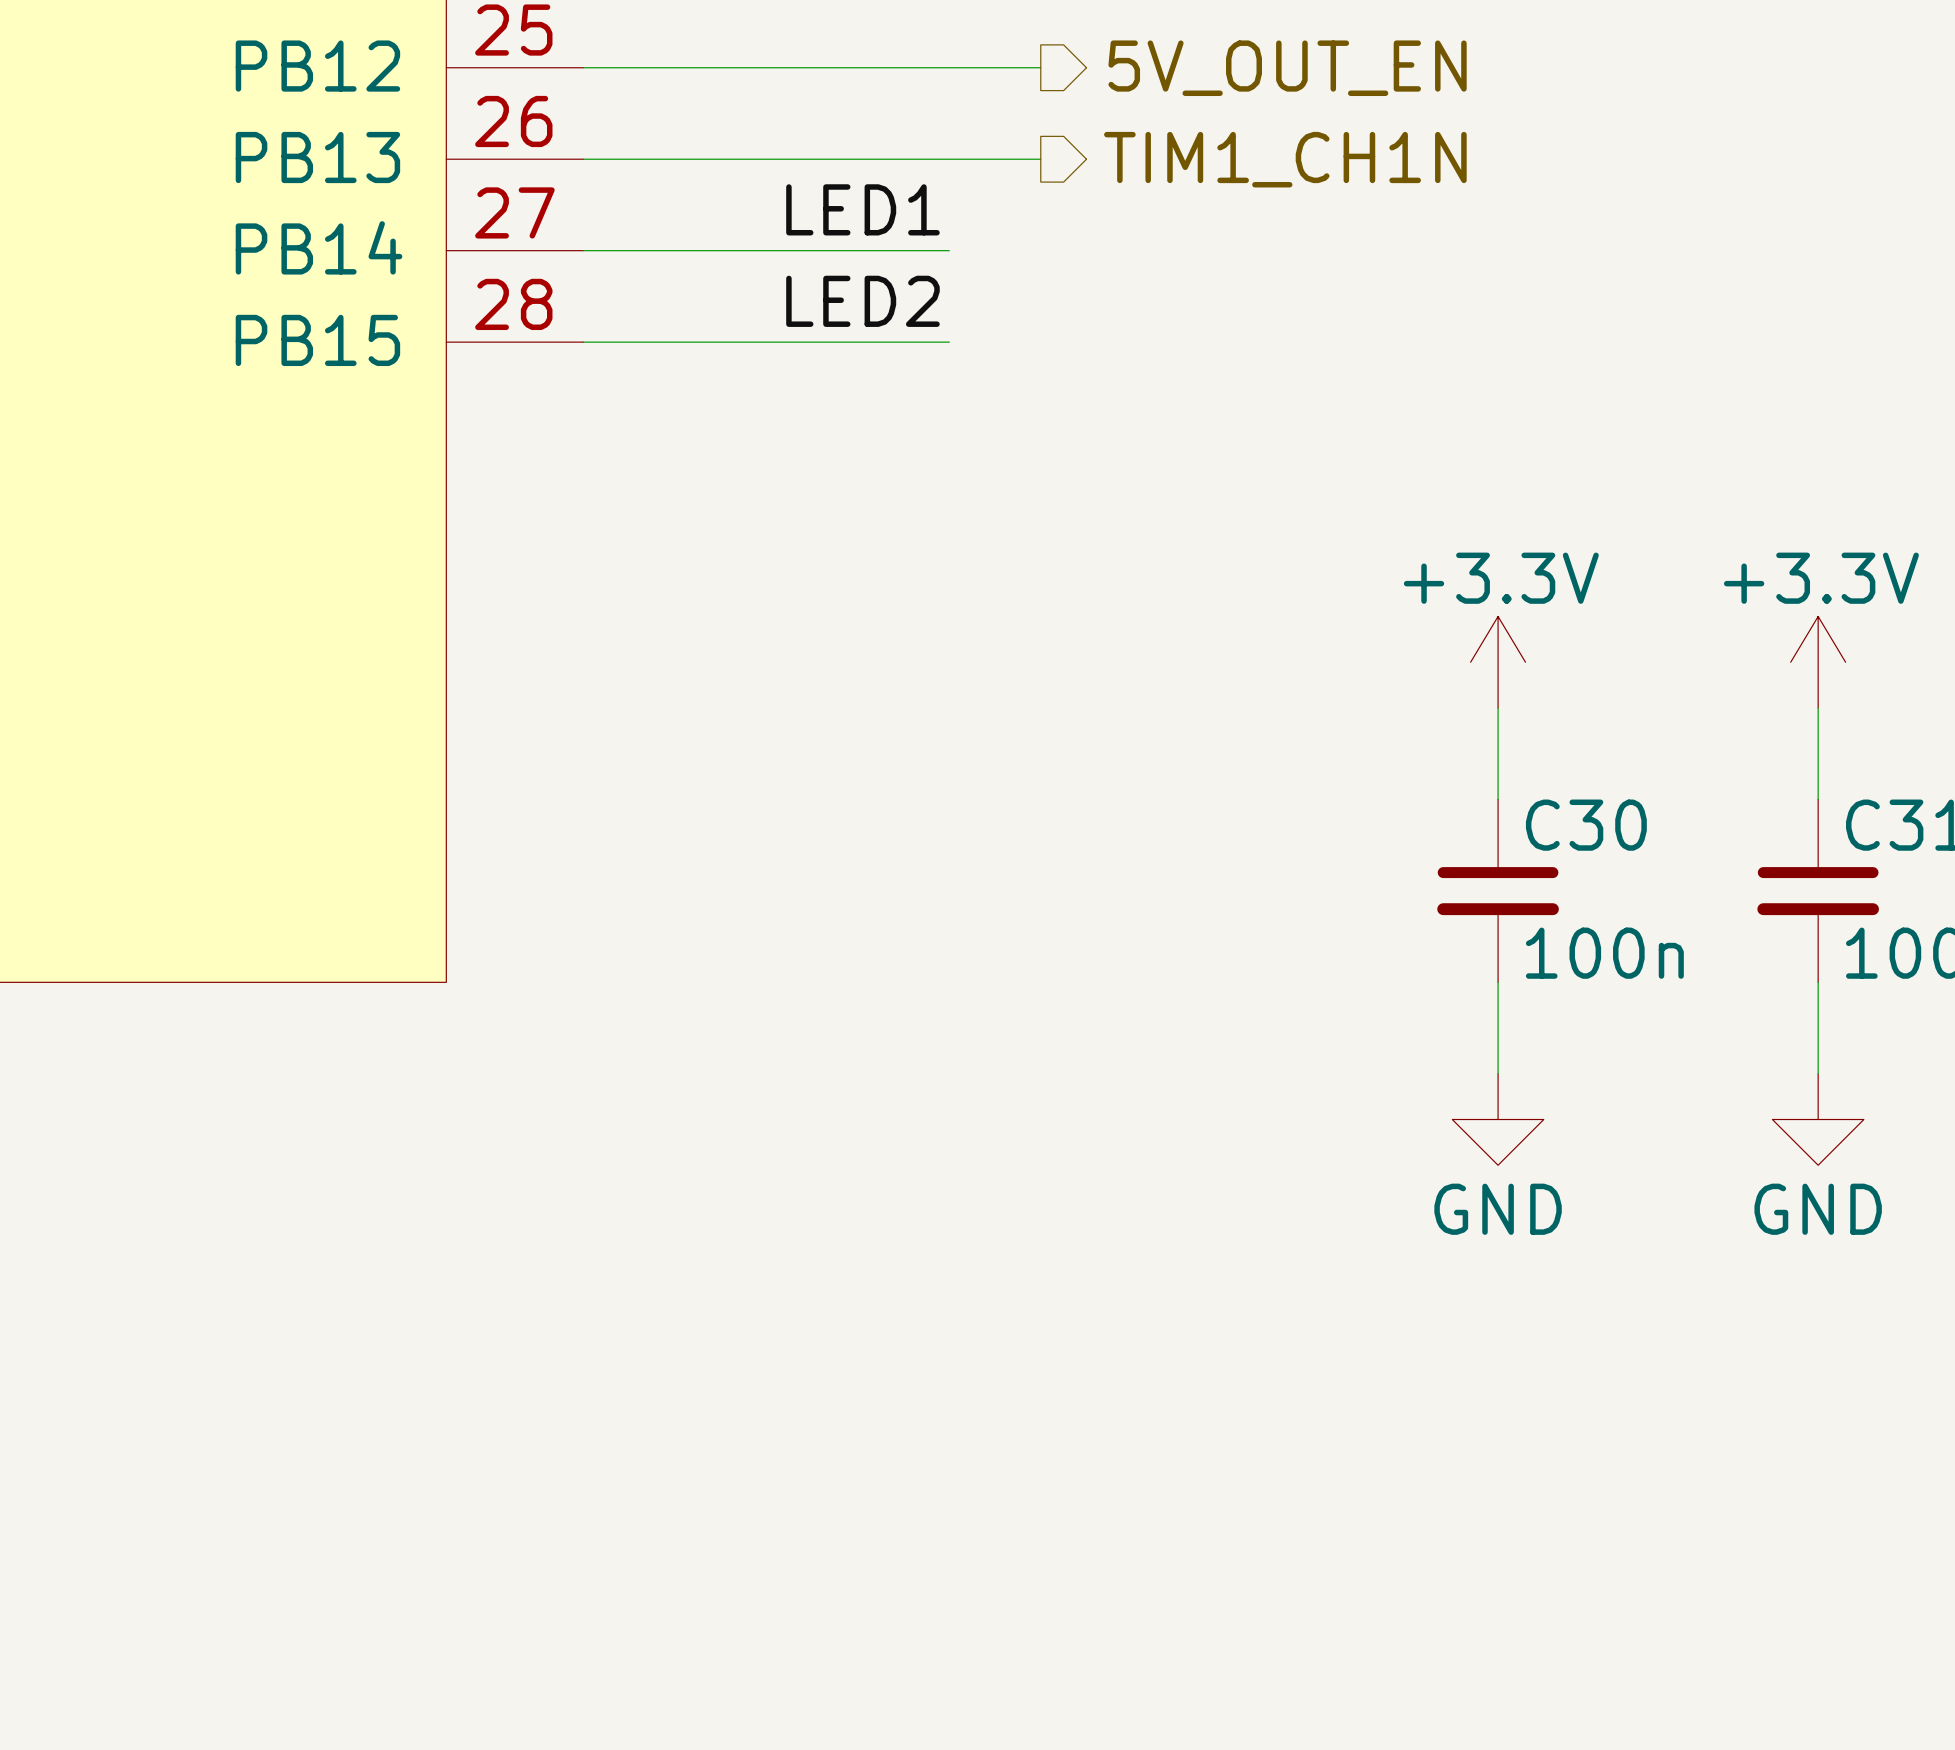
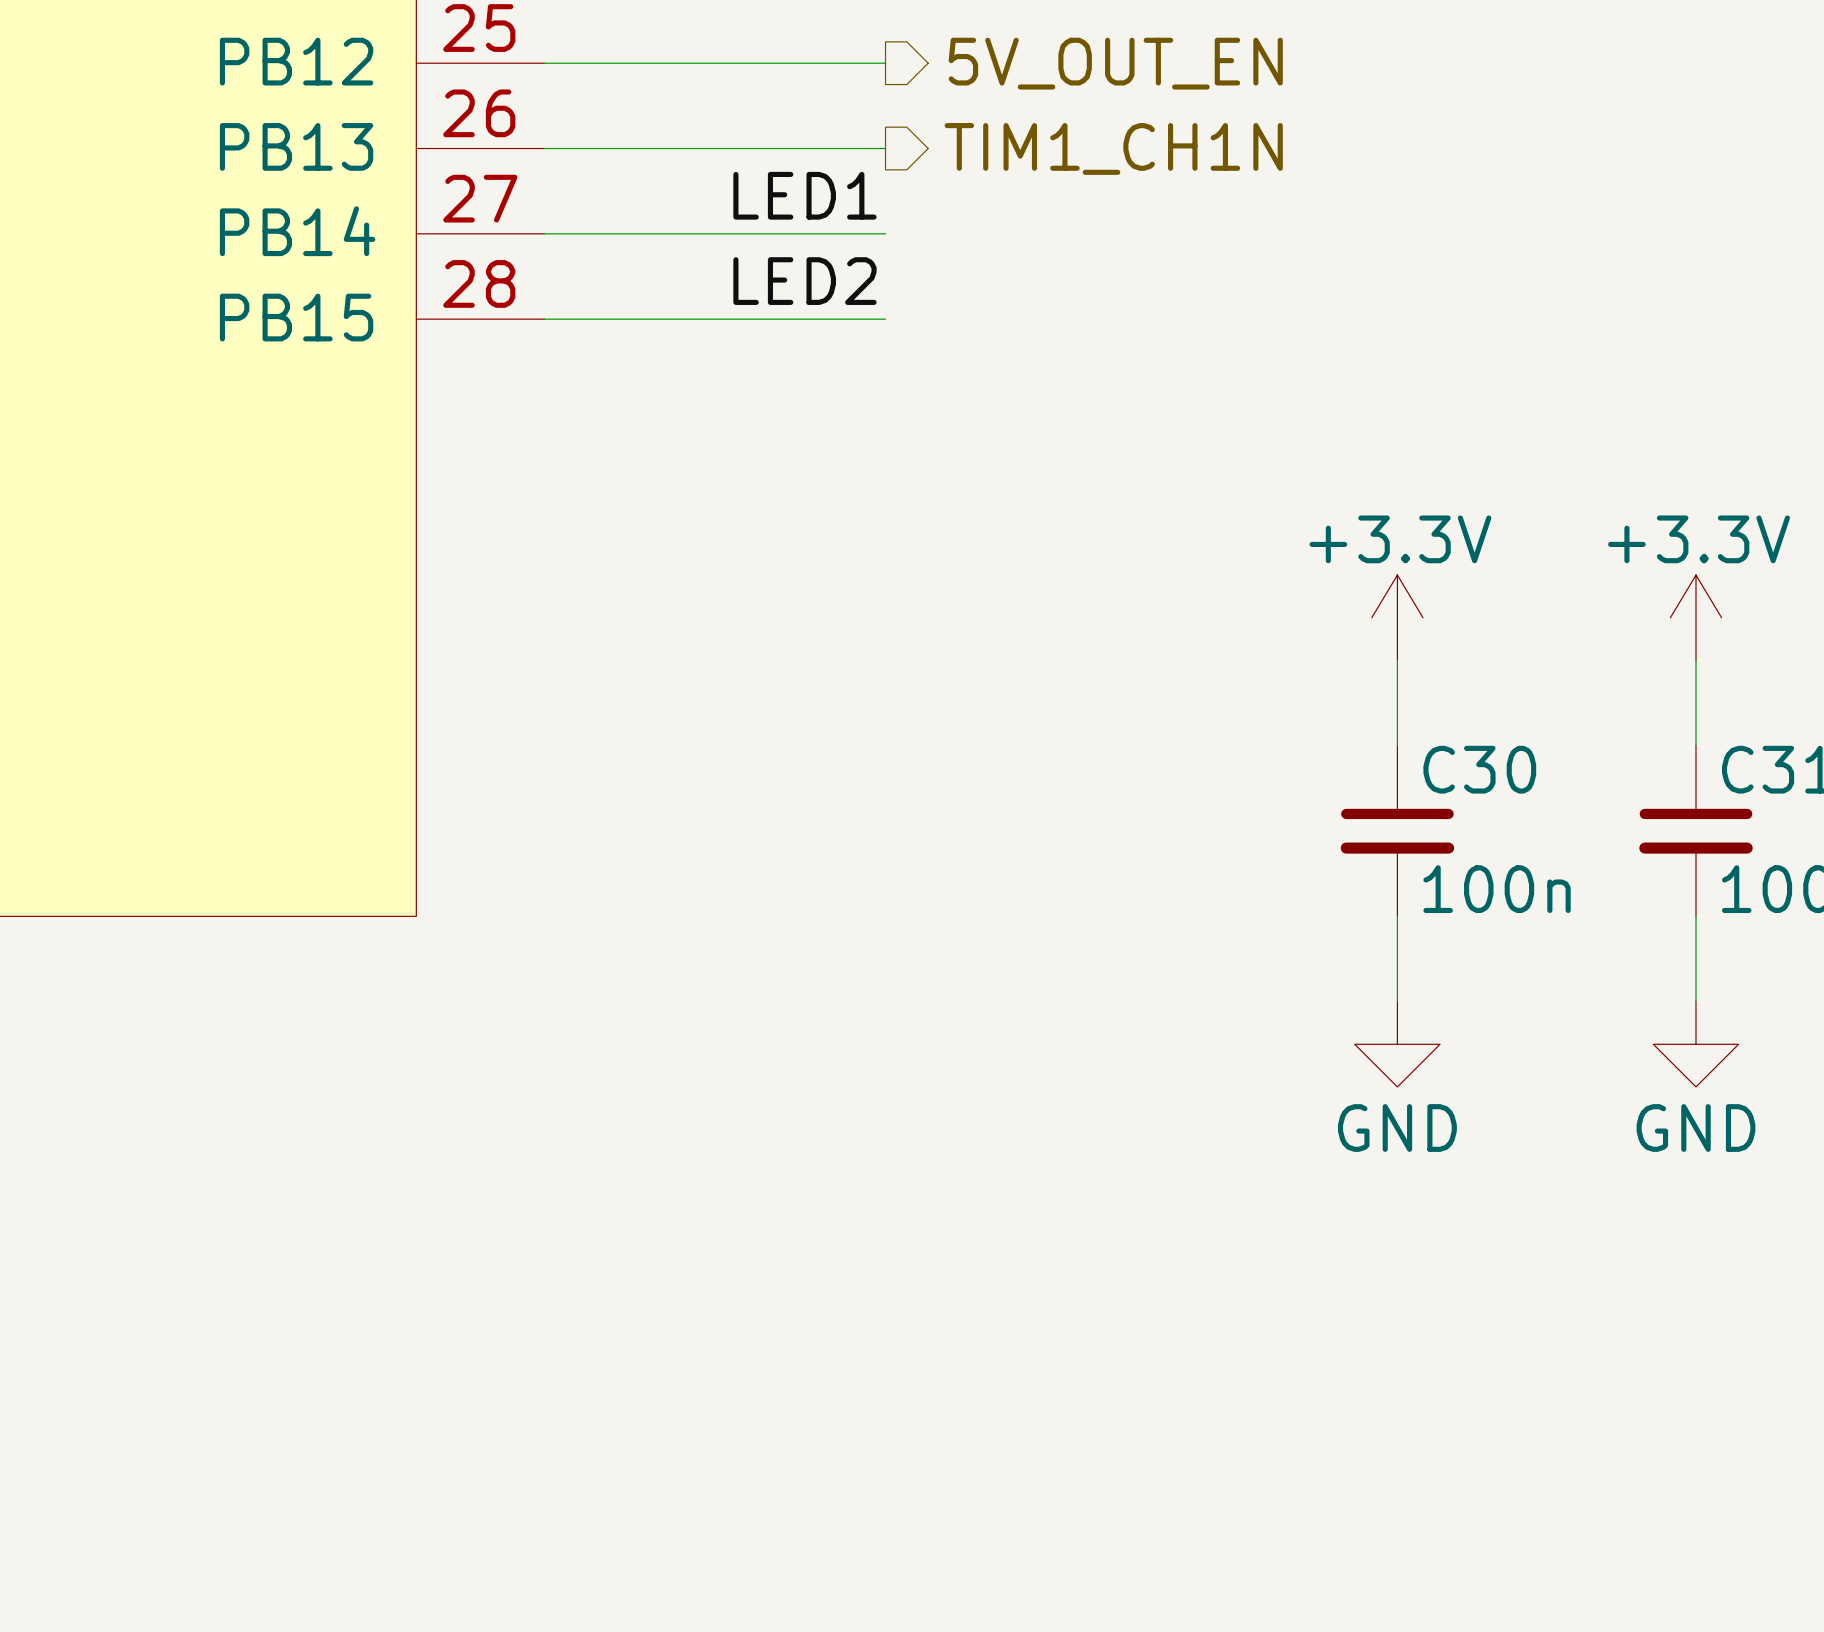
wire: (949, 67) (1040, 67) -> none
hierarchical label position: 5V_OUT_EN (1287, 68) -> 5V_OUT_EN (1115, 63)
wire: (949, 159) (1040, 159) -> none
hierarchical label position: TIM1_CH1N (1285, 159) -> TIM1_CH1N (1113, 148)

